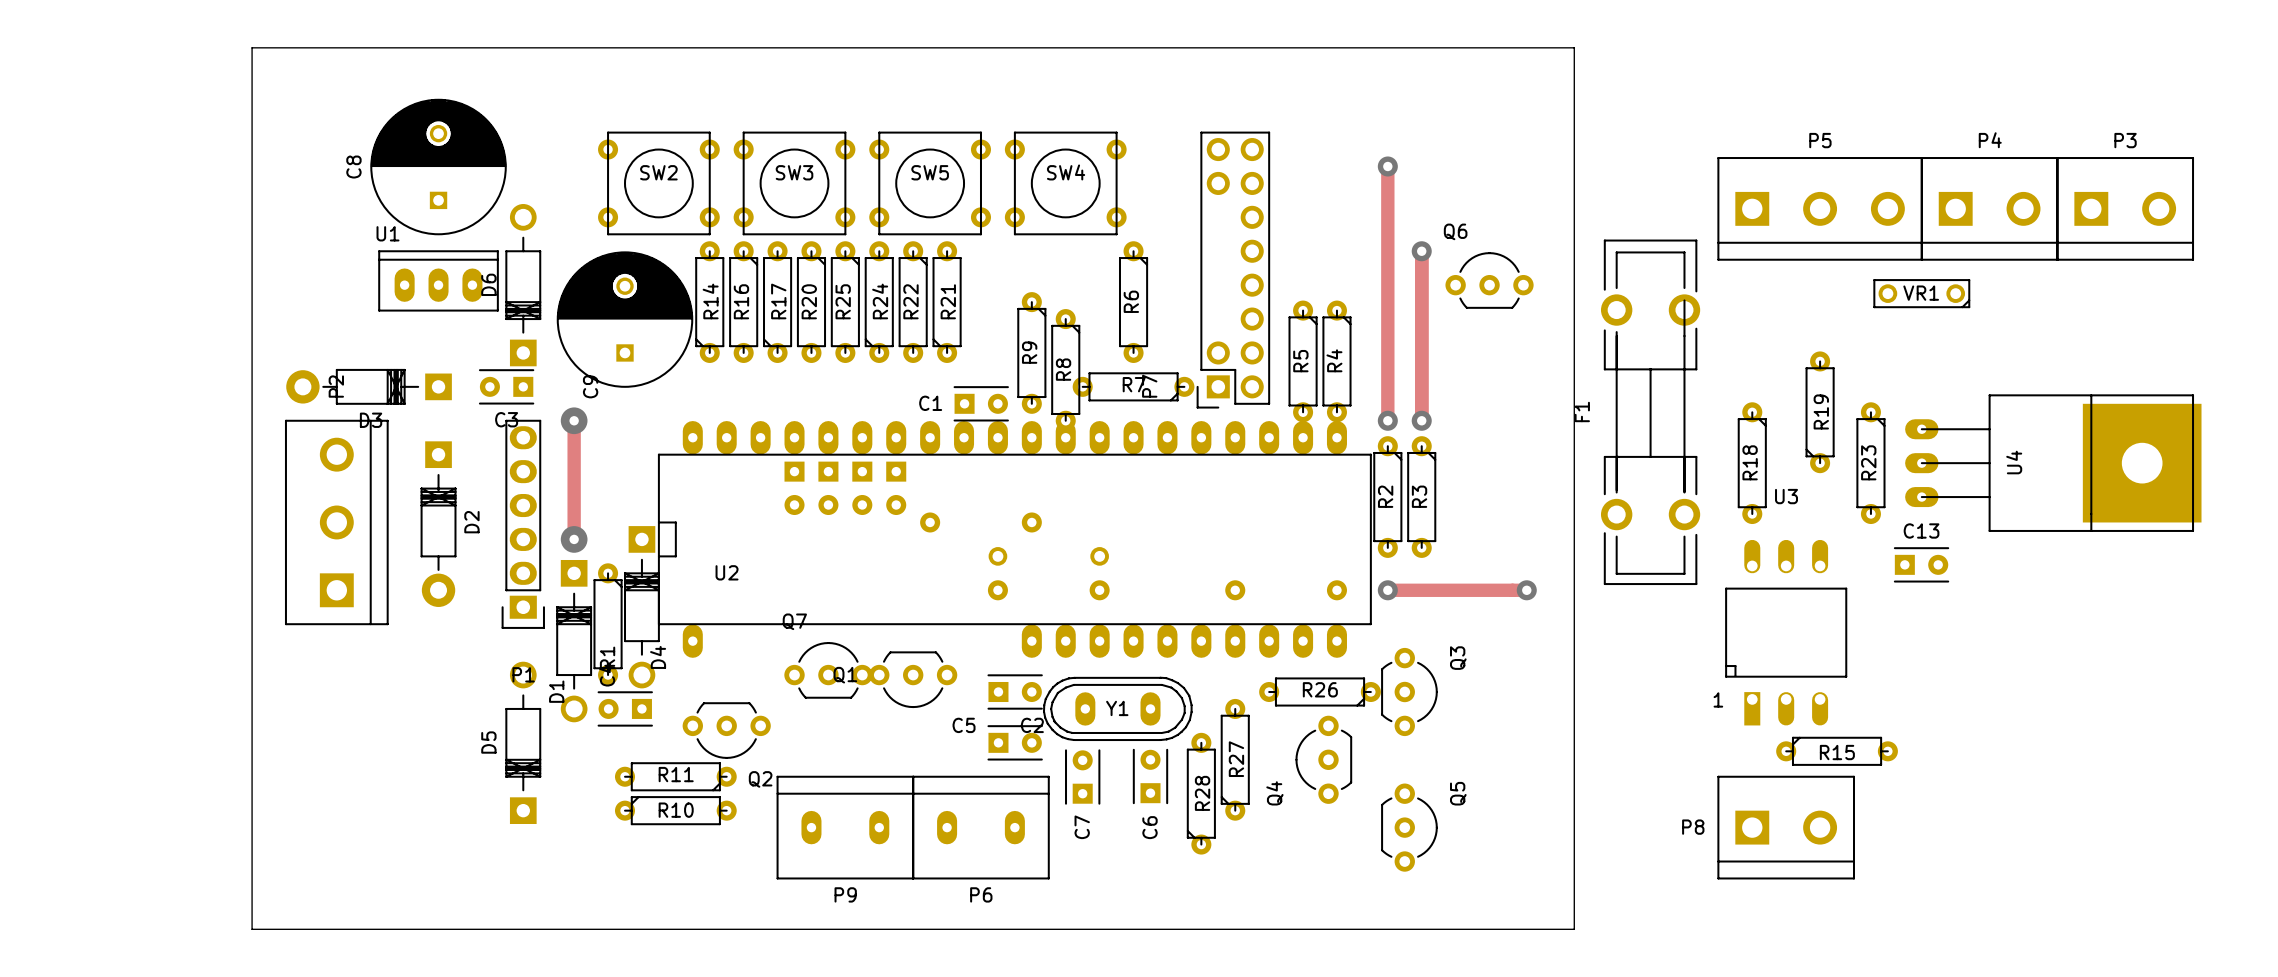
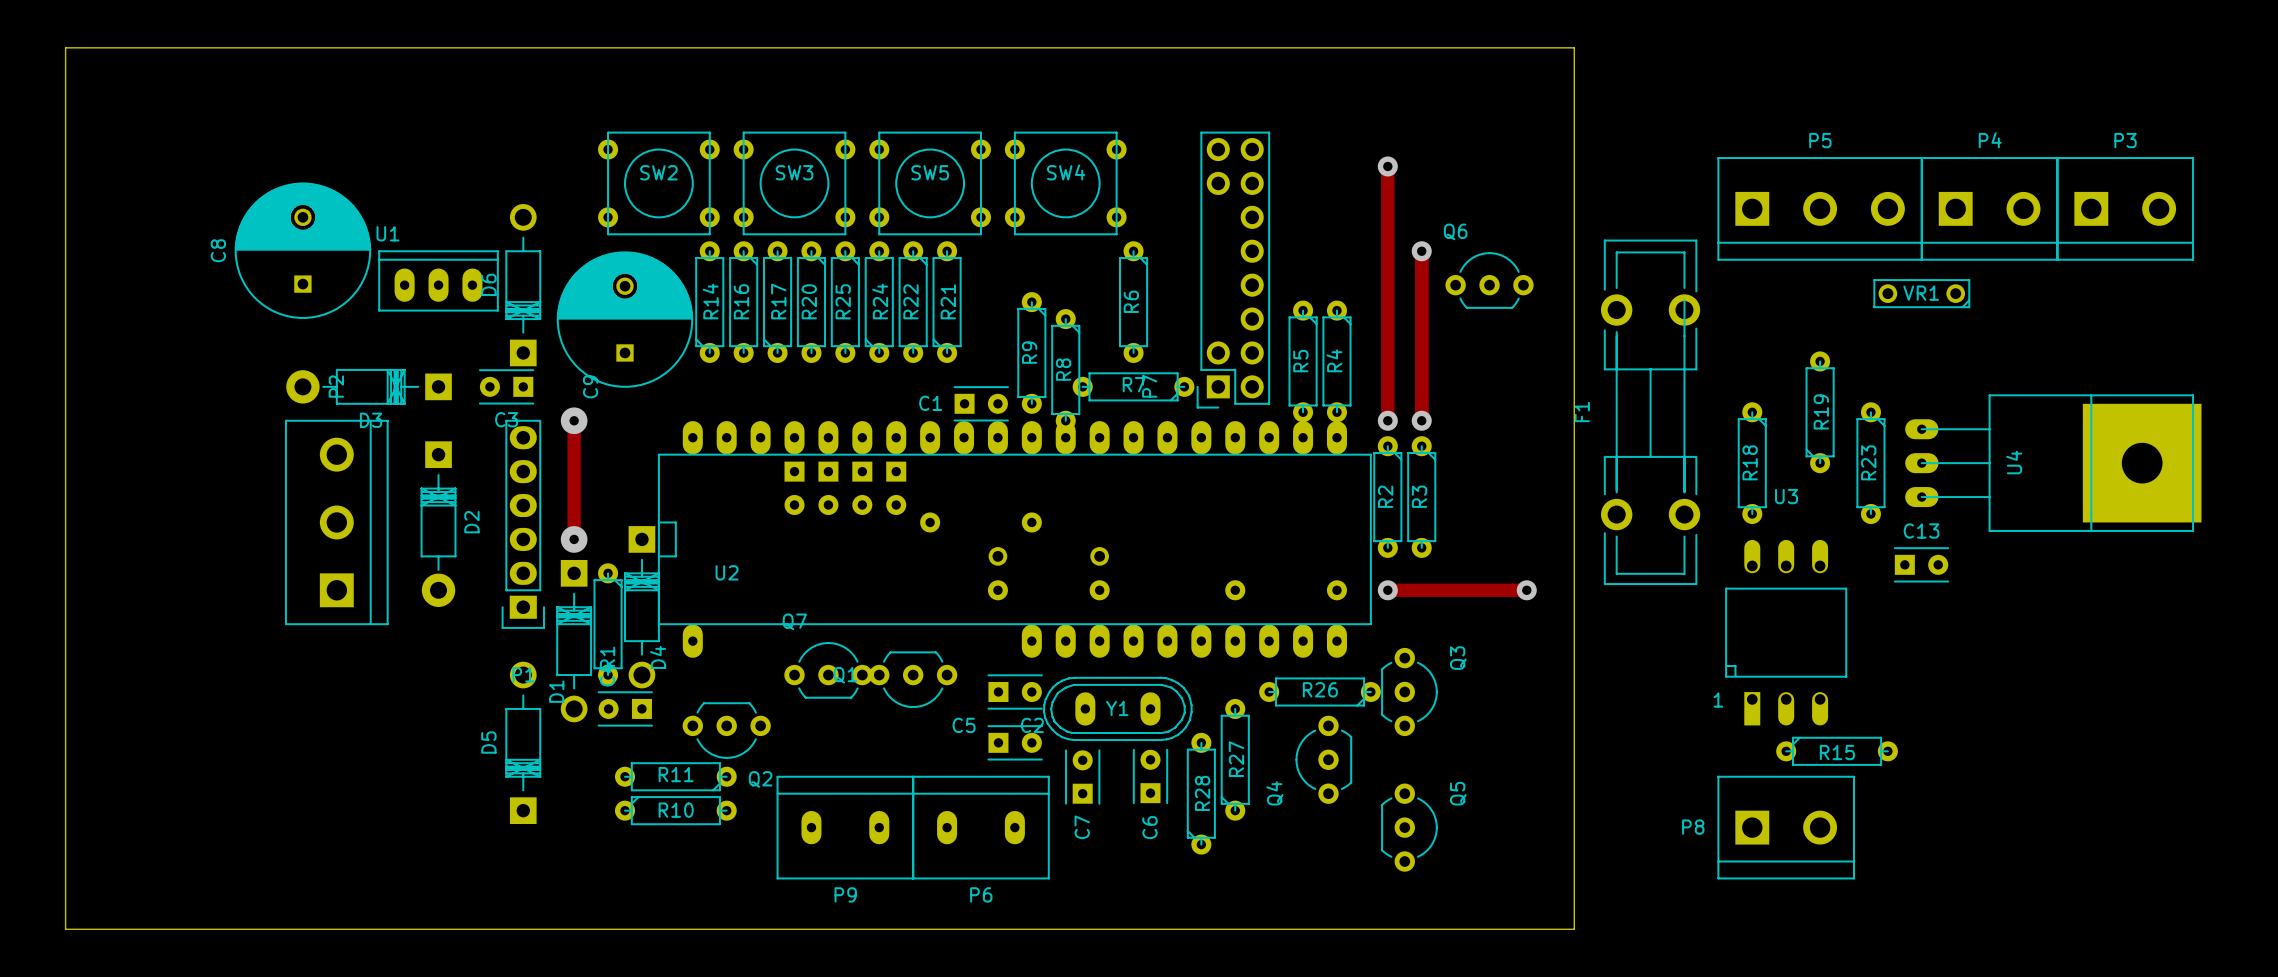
board edge: (252, 47) (252, 929) -> (252, 47) (65, 47) (65, 929) (252, 929)
C8 position: (438, 167) -> (302, 250)

